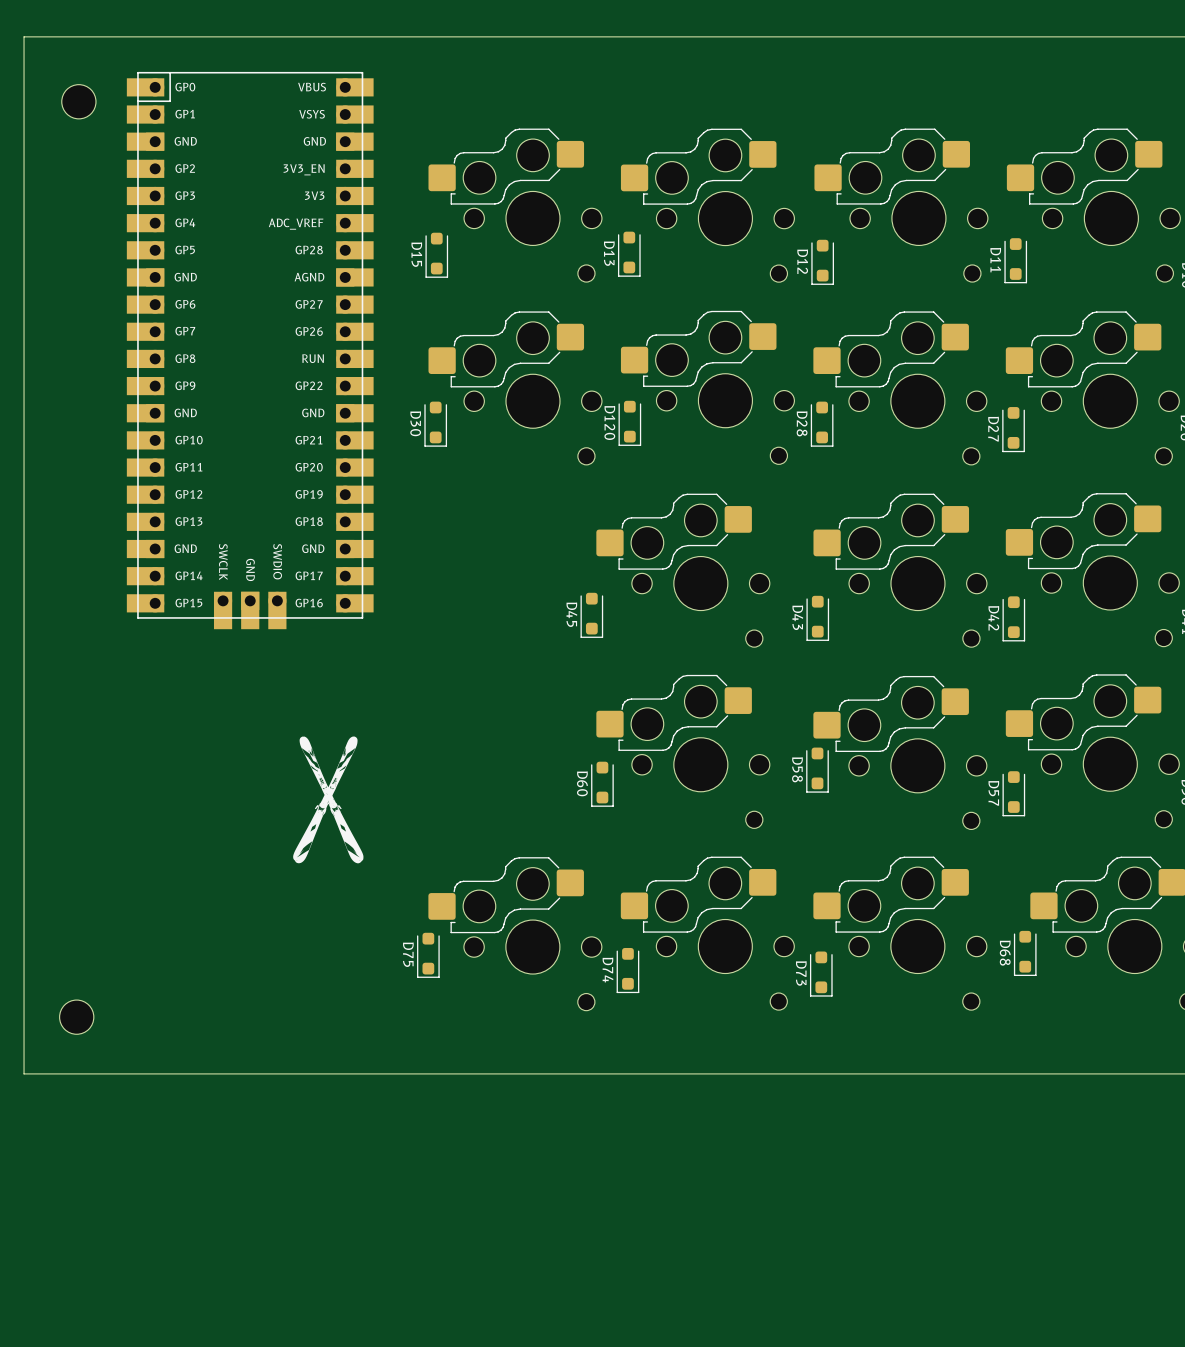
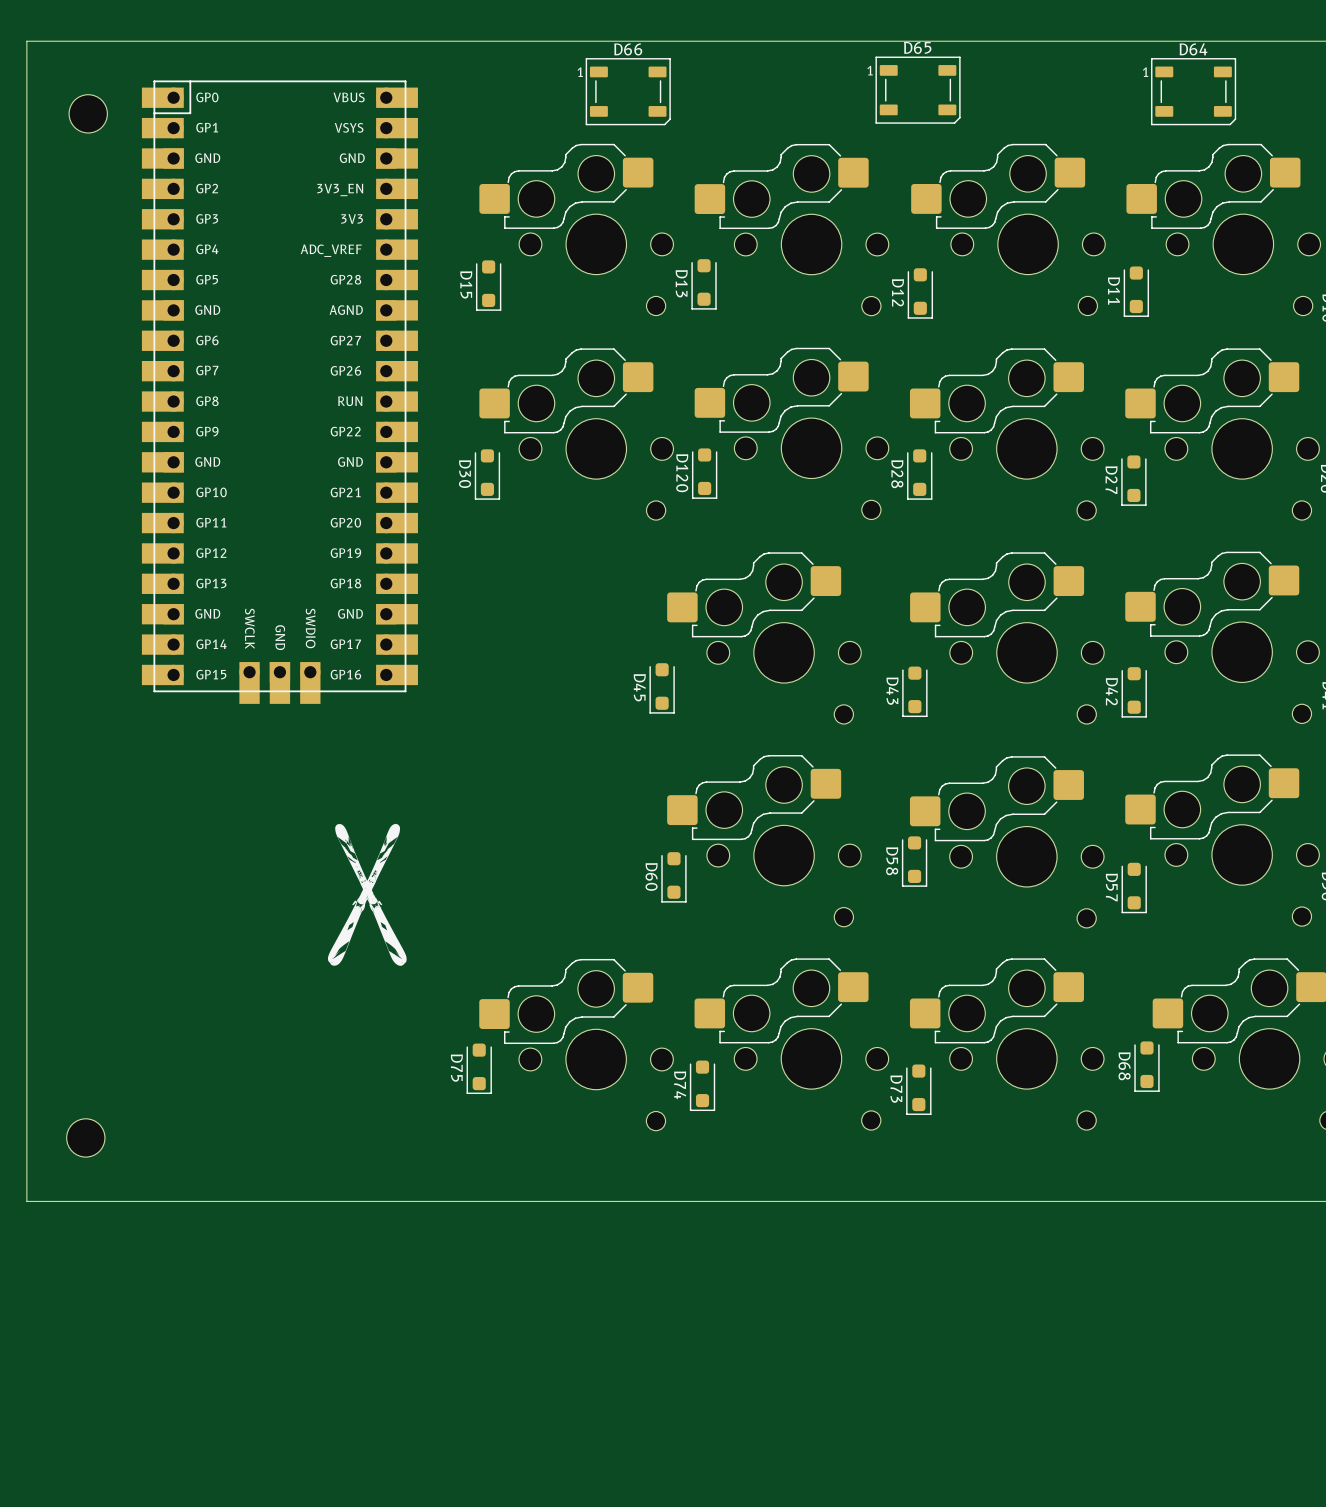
D65: none -> (918, 90)
D66: none -> (628, 91)
D64: none -> (1193, 91)

